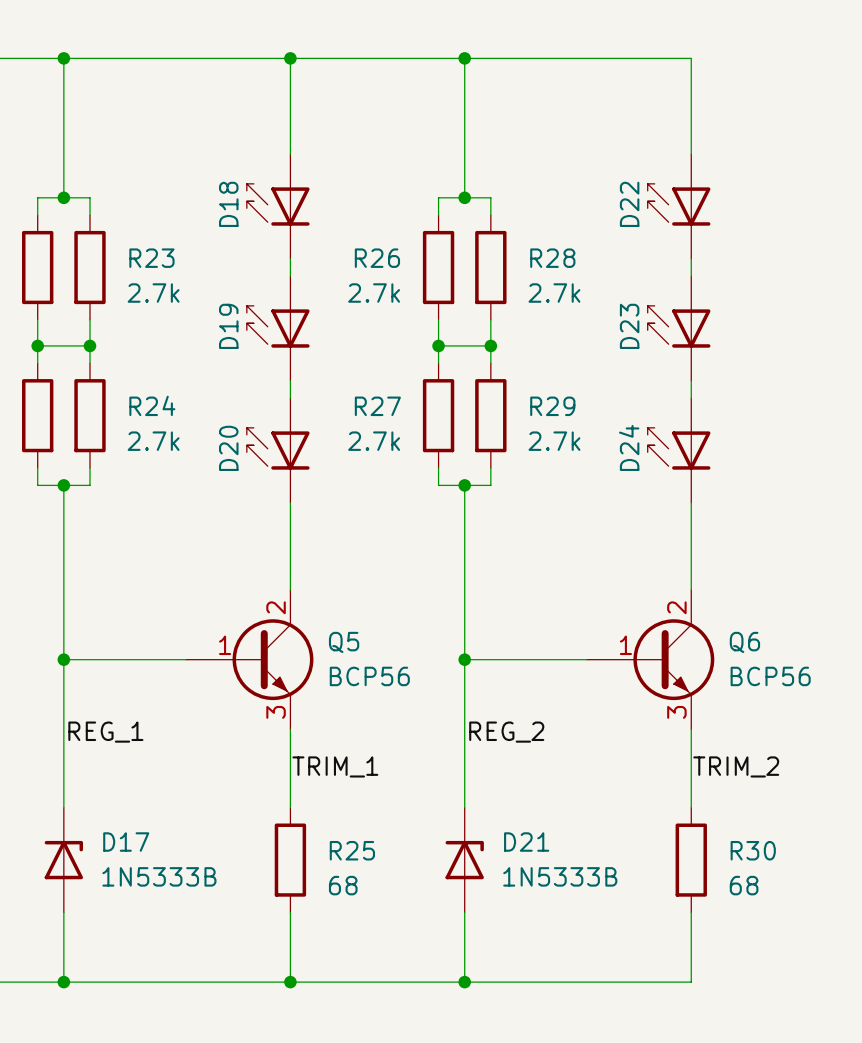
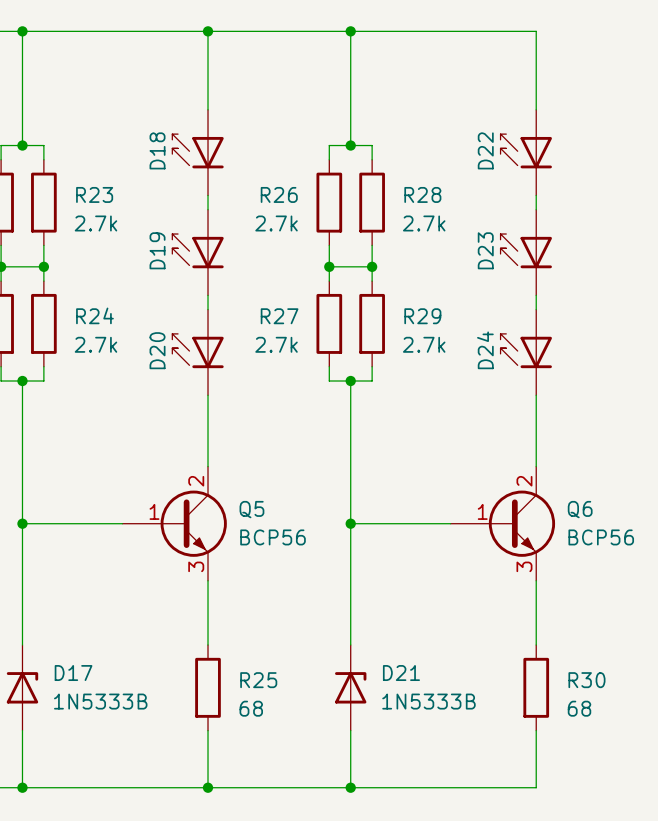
label: REG_1 (105, 732) -> none
label: REG_2 (506, 732) -> none
label: TRIM_1 (335, 766) -> none
label: TRIM_2 (736, 766) -> none

